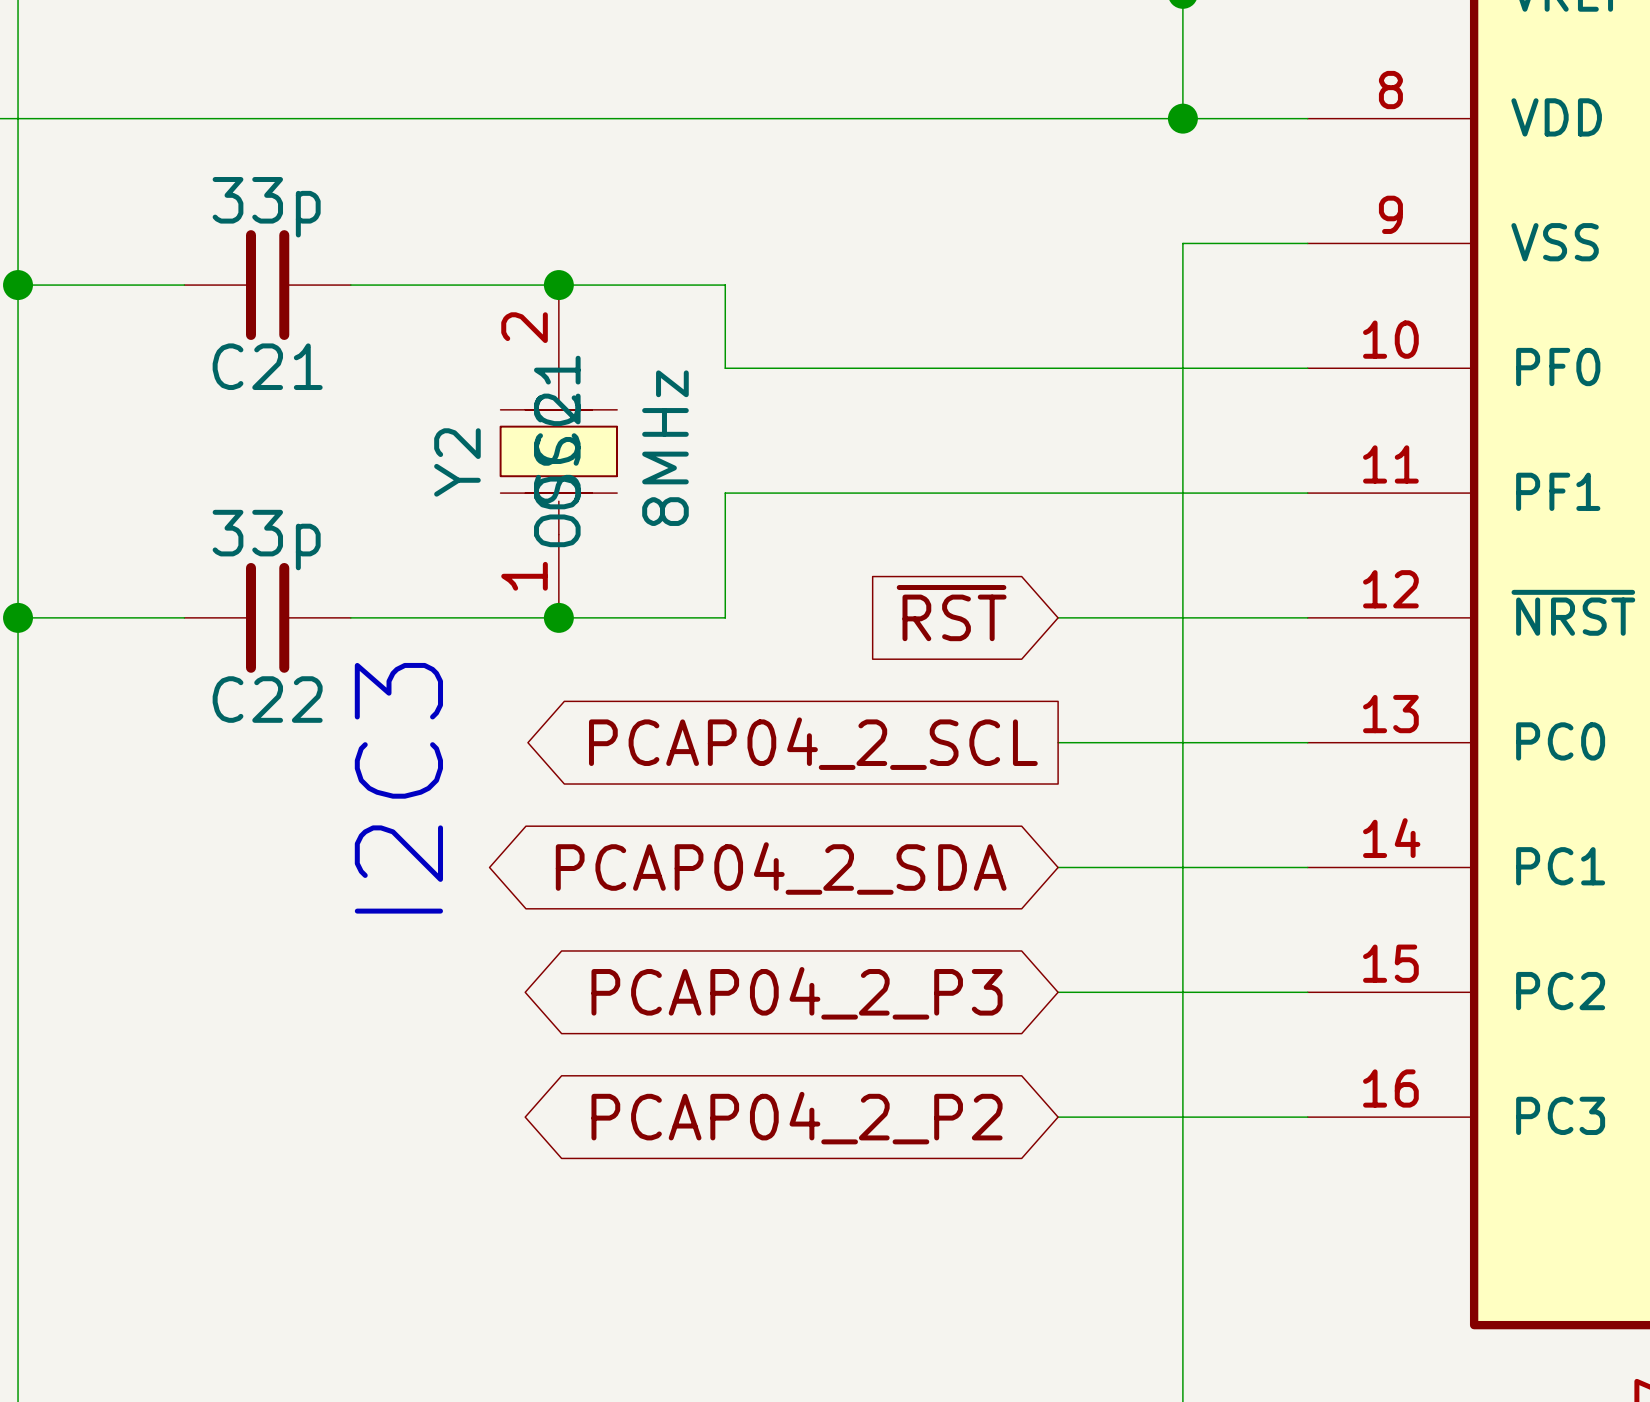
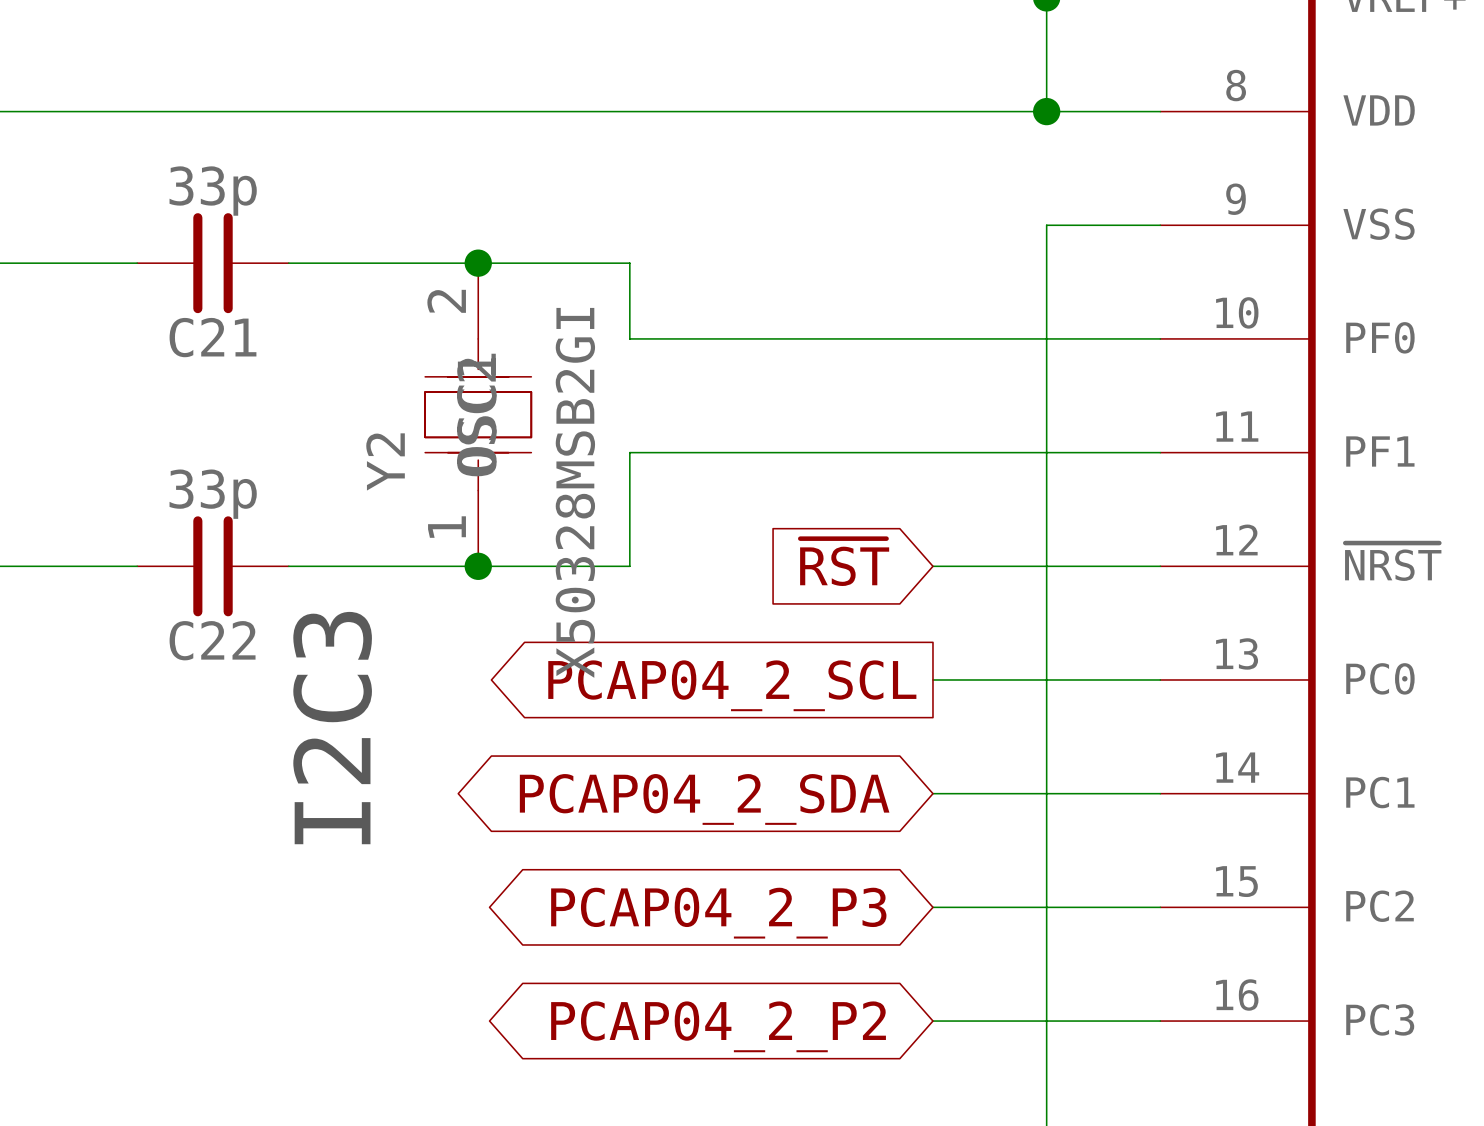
Y2 value: 8MHz (665, 448) -> X50328MSB2GI (575, 492)
Y2 name position: Y2 (457, 462) -> Y2 (385, 461)

